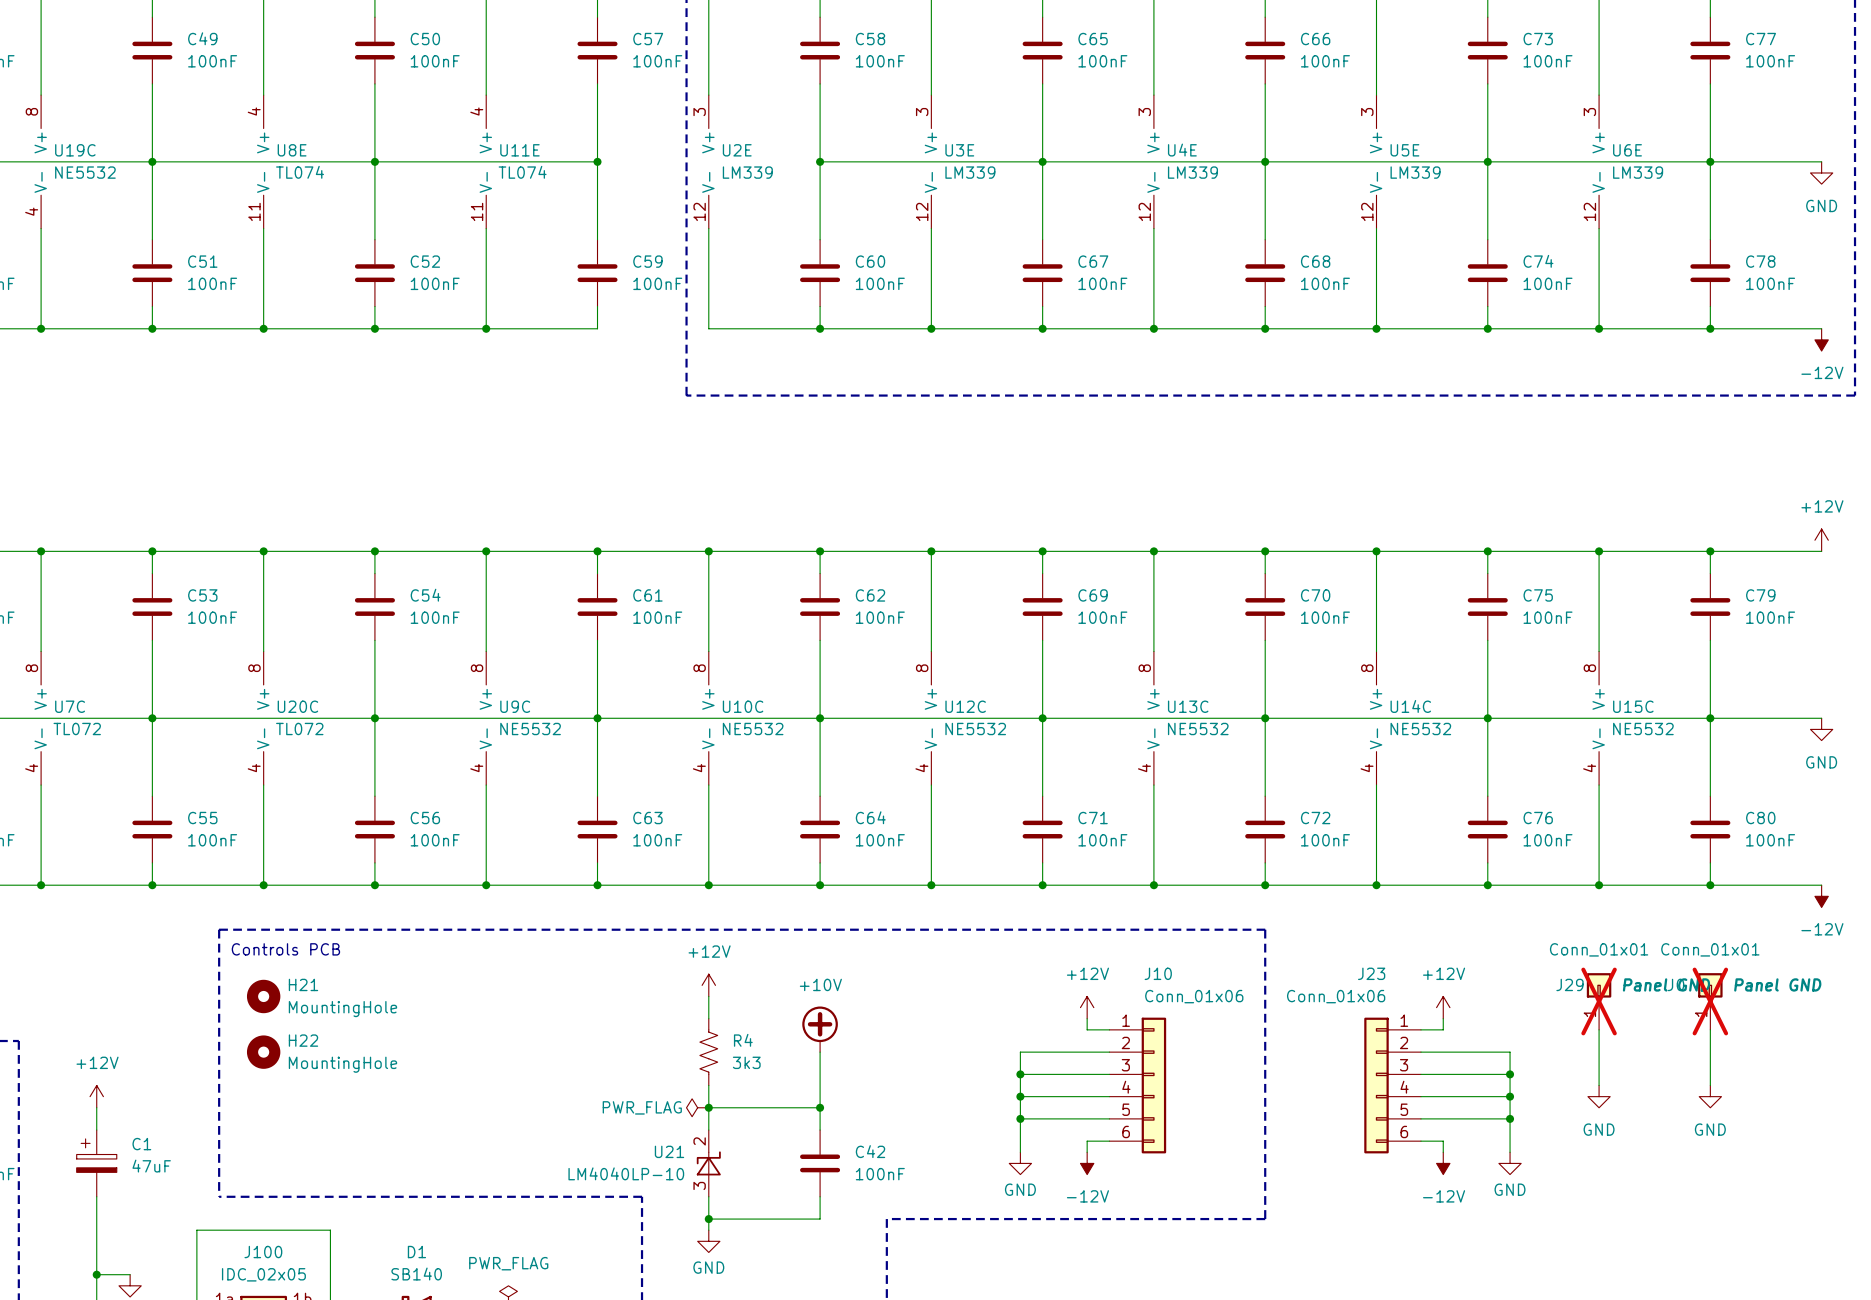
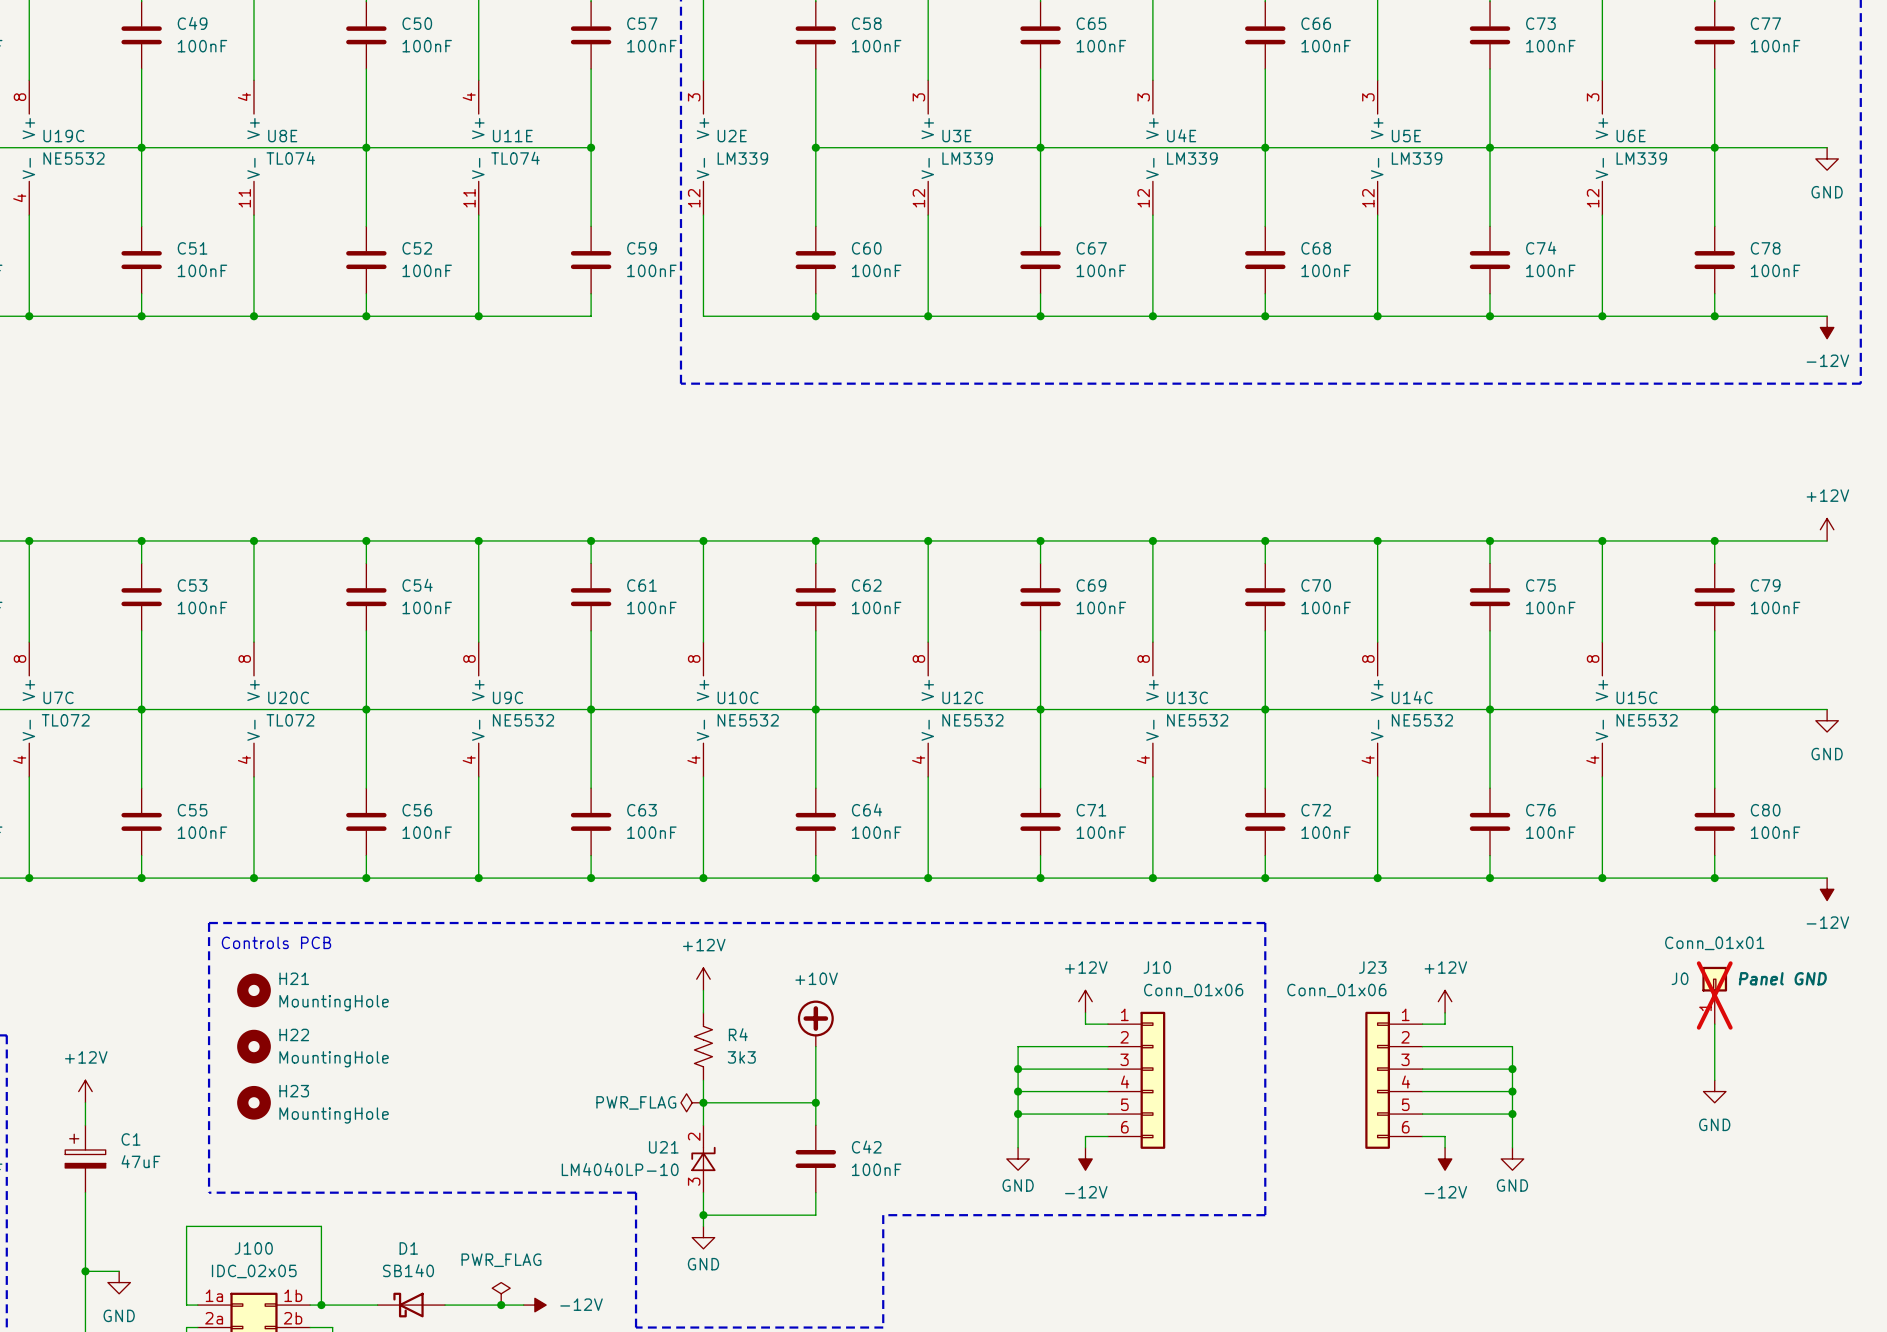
J29: Conn_01x01 (1599, 1001) -> none
wire: (1599, 1029) (1599, 1085) -> none
power symbol: GND (1599, 1096) -> none
H23: none -> MountingHole (253, 1102)

